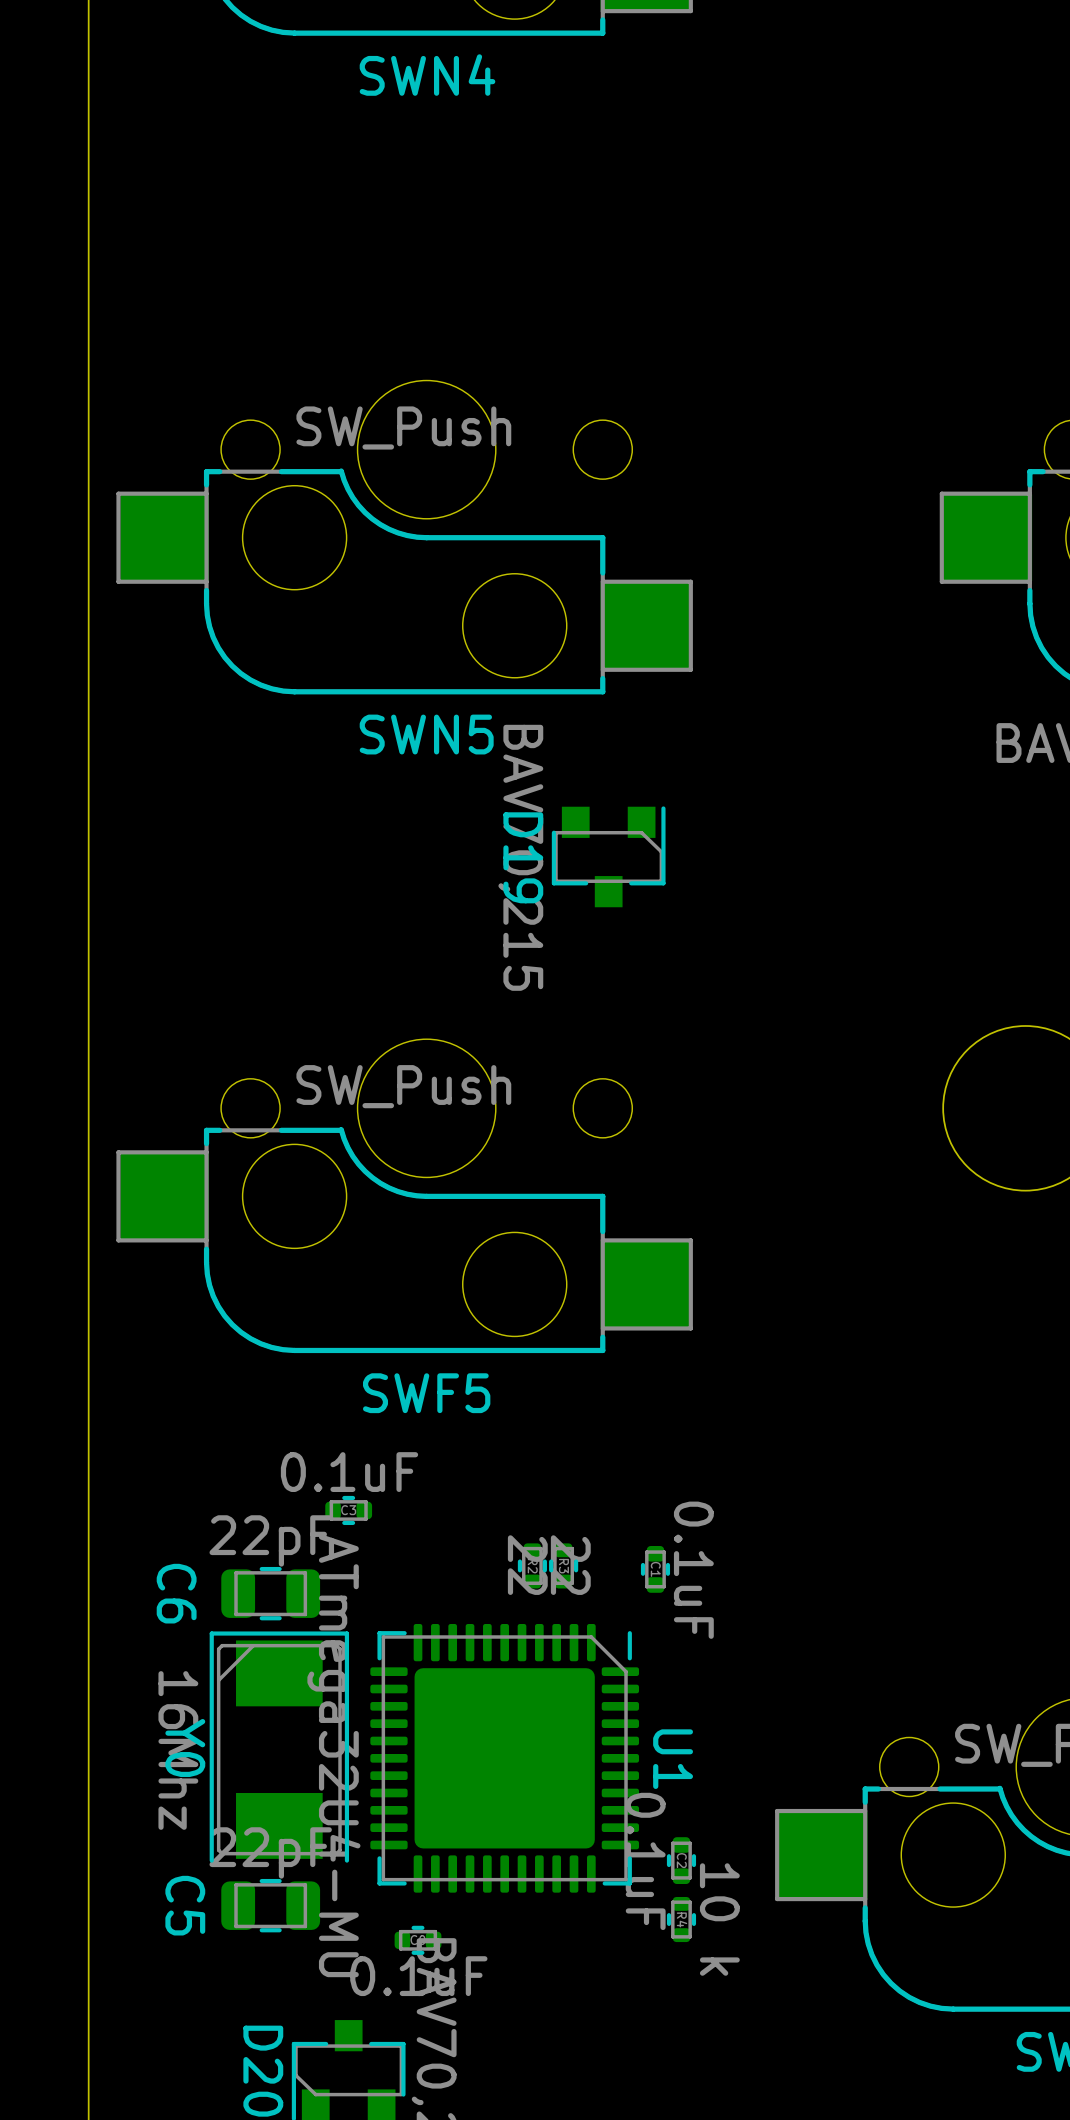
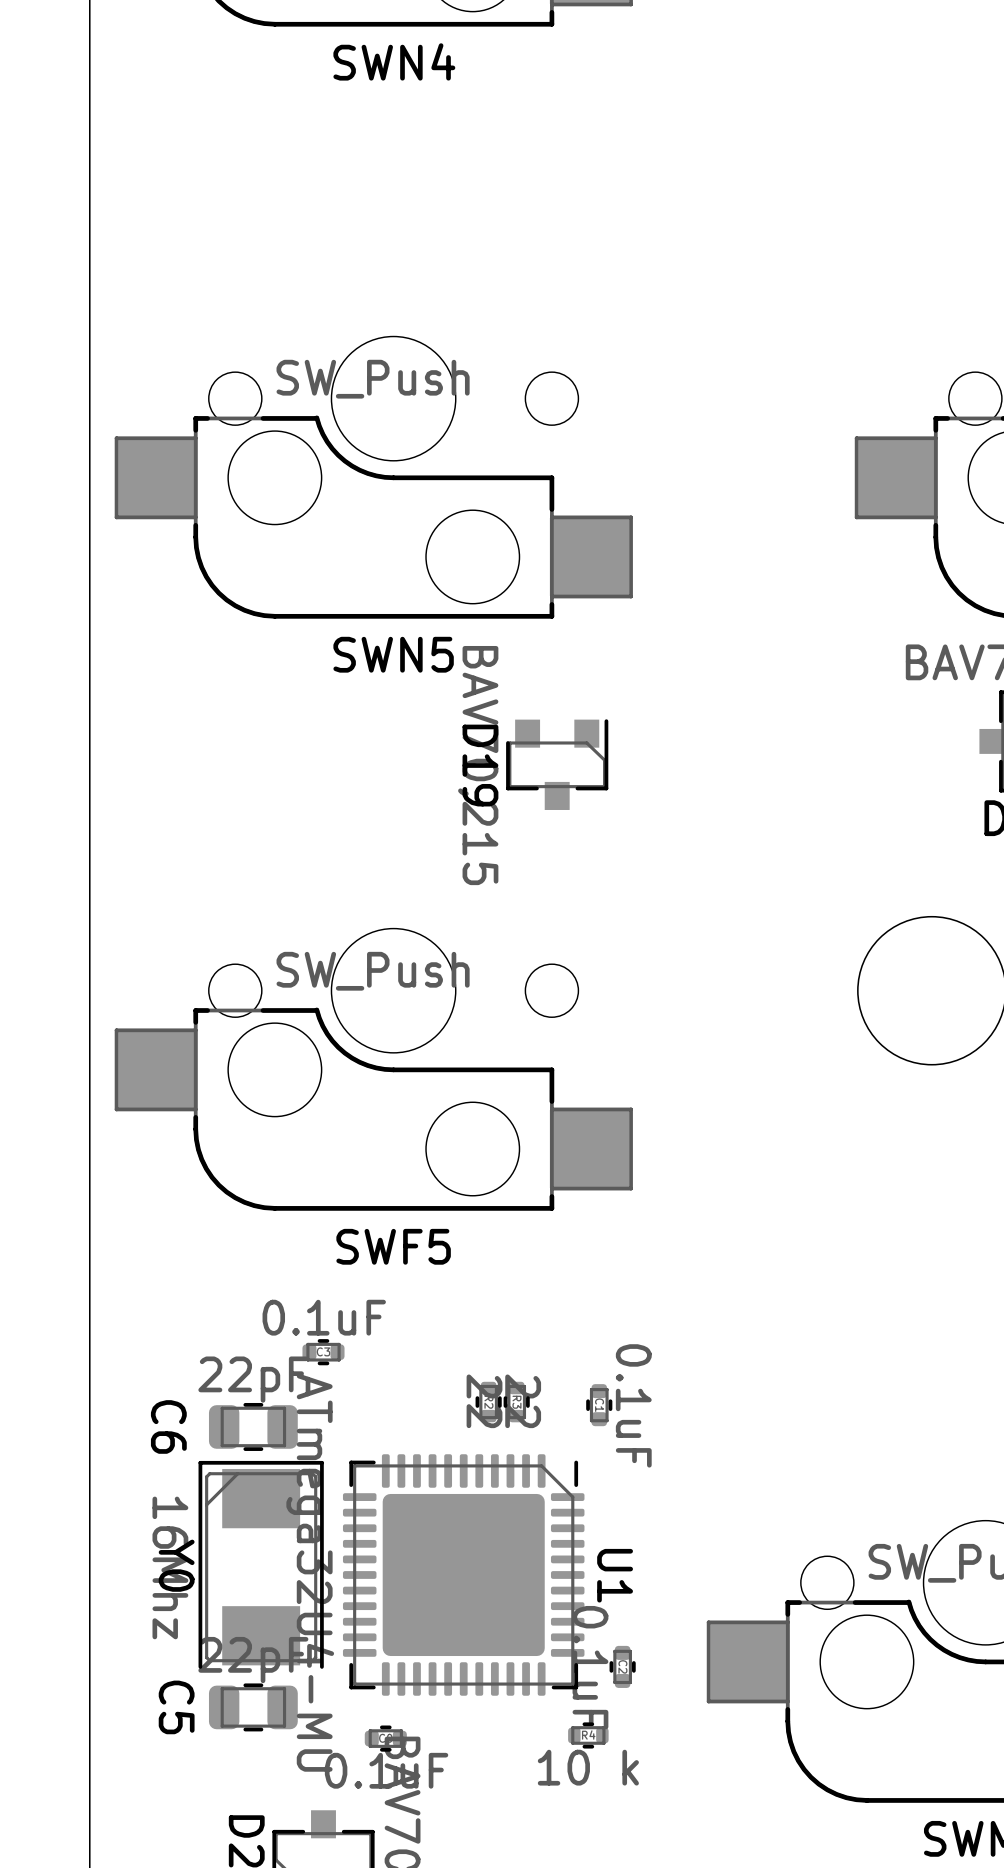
R4 rotation: 0° (681, 1919) -> 90° clockwise (588, 1735)
R4 position: (681, 1919) -> (588, 1735)

